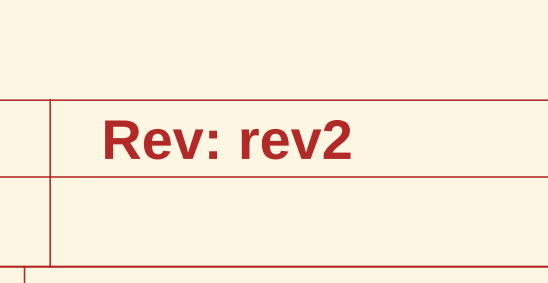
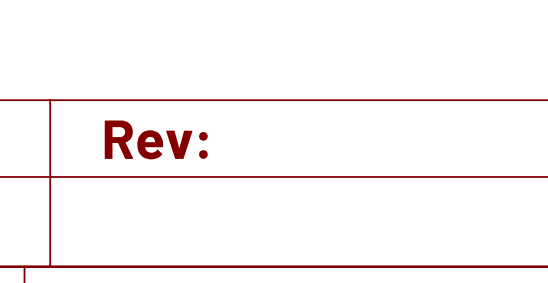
title block: Rev: rev2 (227, 139) -> Rev: (156, 139)

